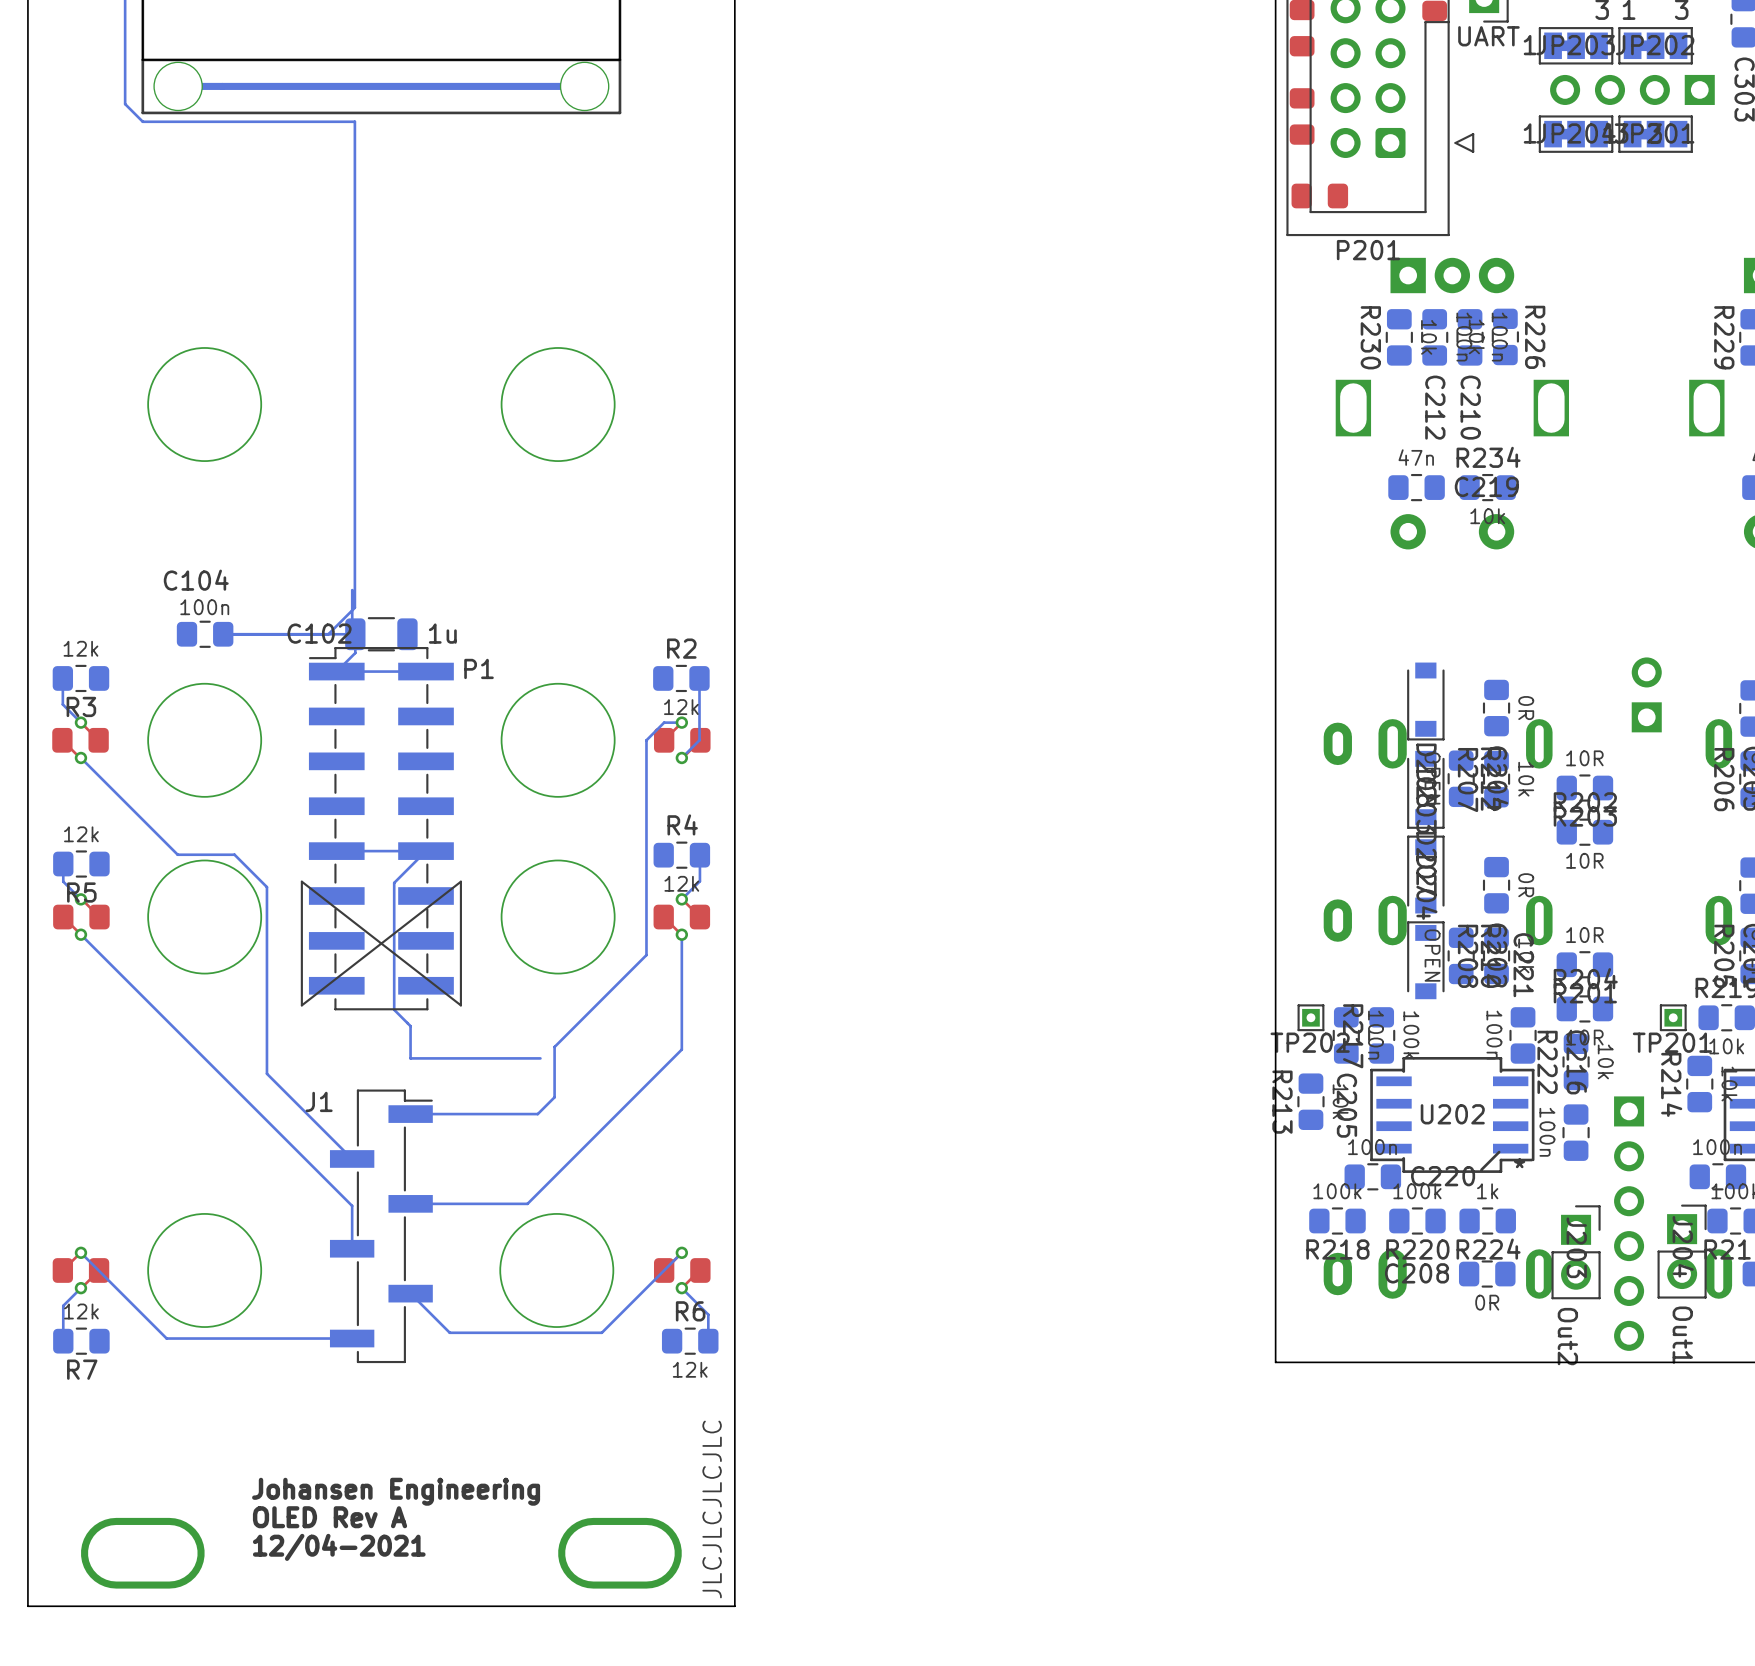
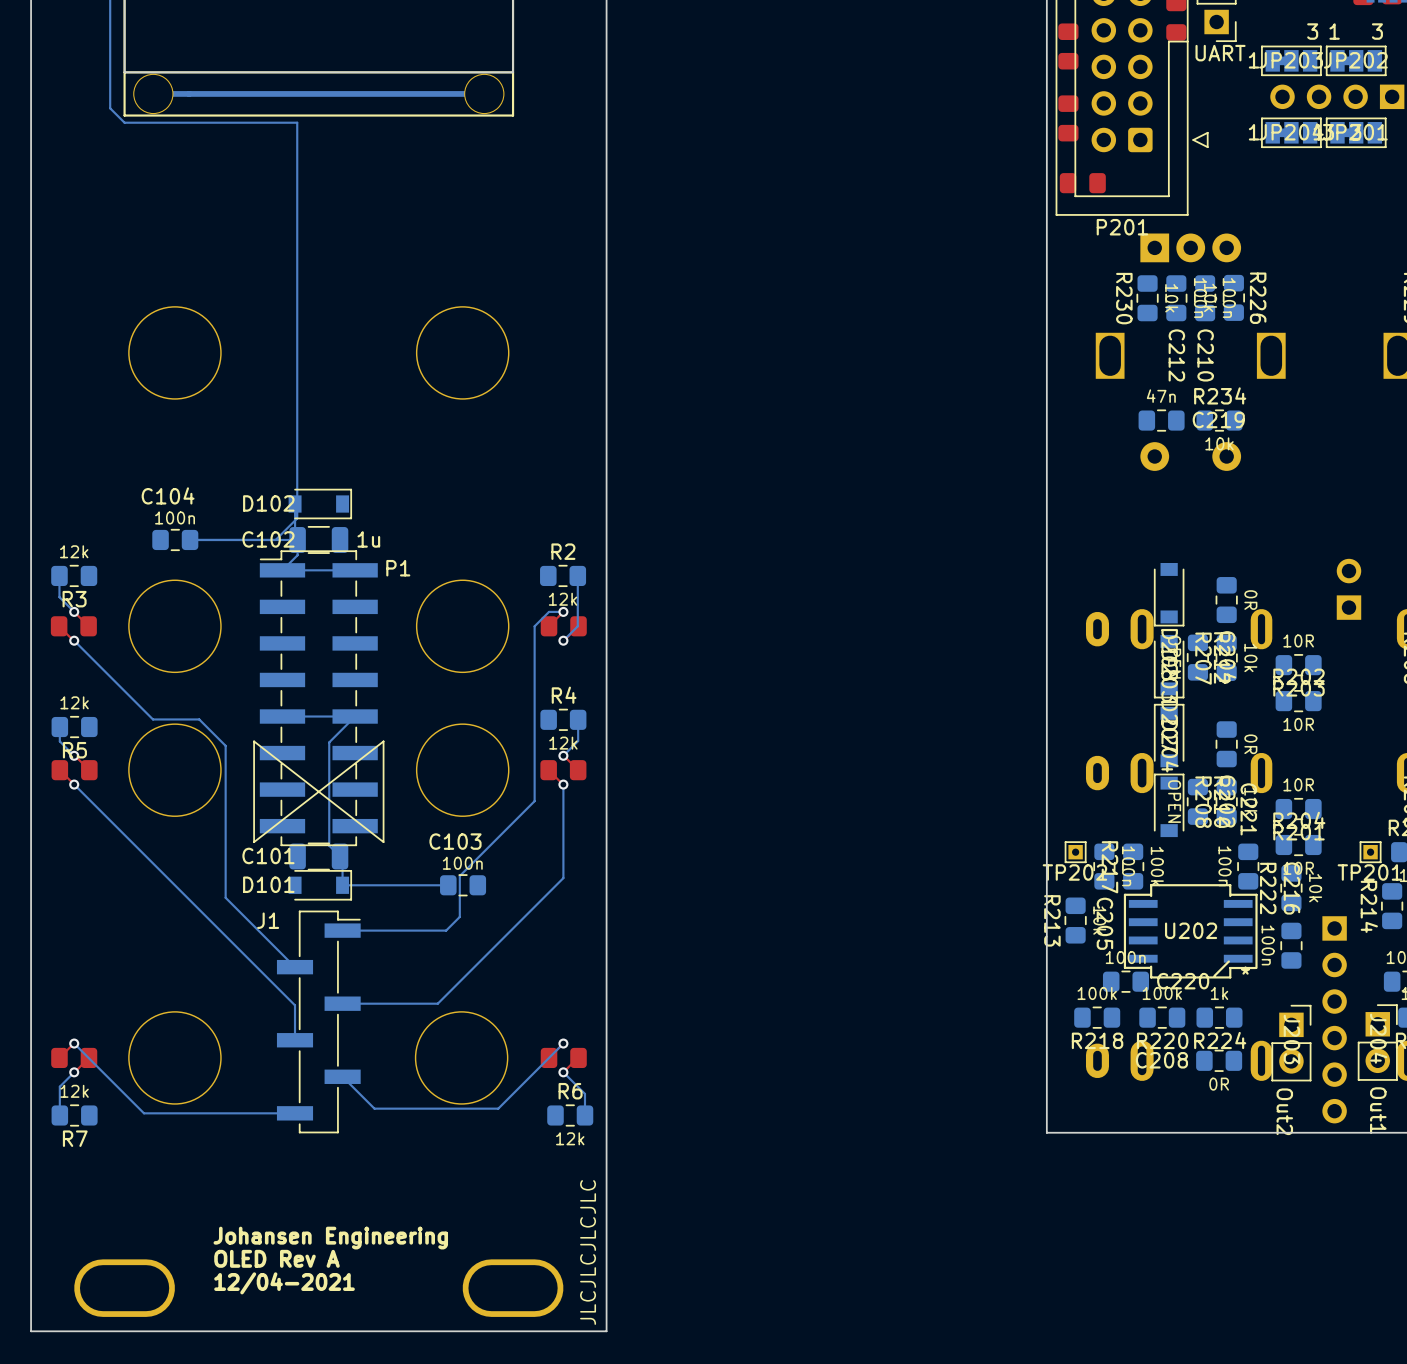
D102: none -> (320, 504)
C101: none -> (318, 856)
D101: none -> (320, 885)
C103: none -> 100n (463, 885)

